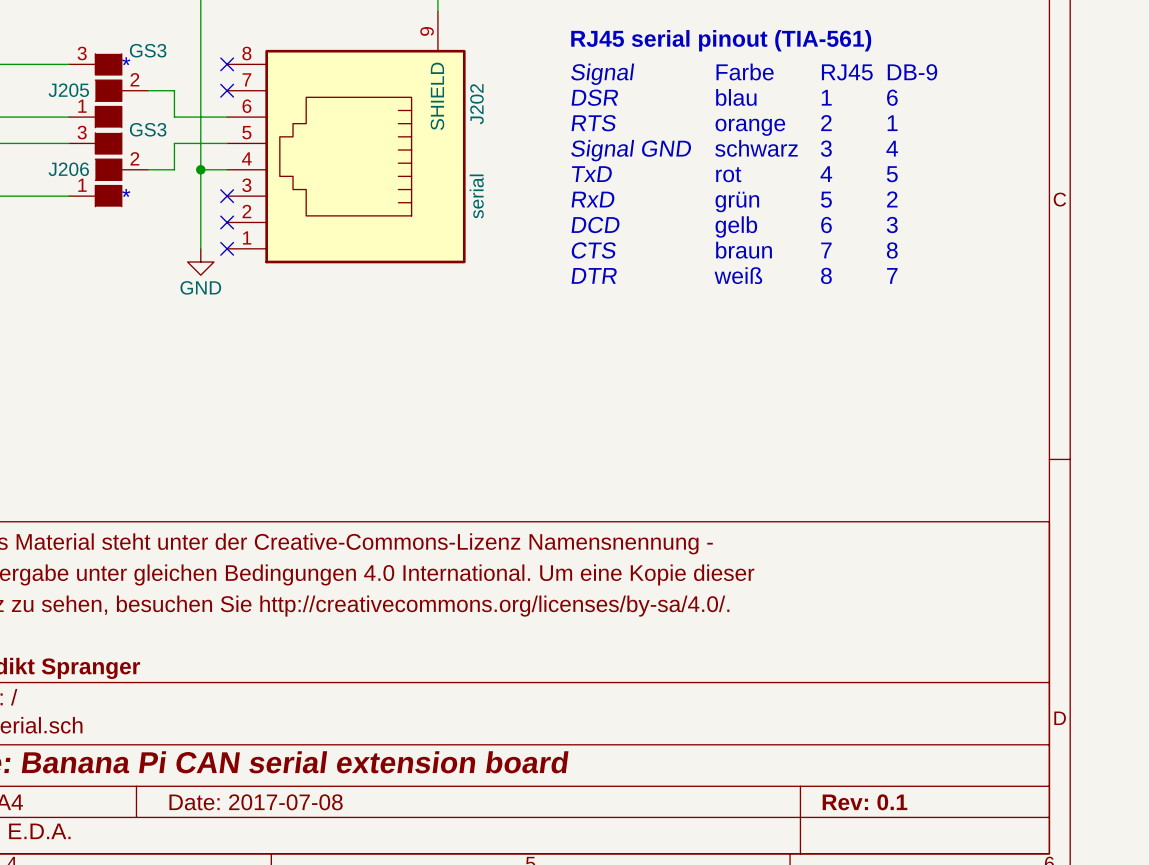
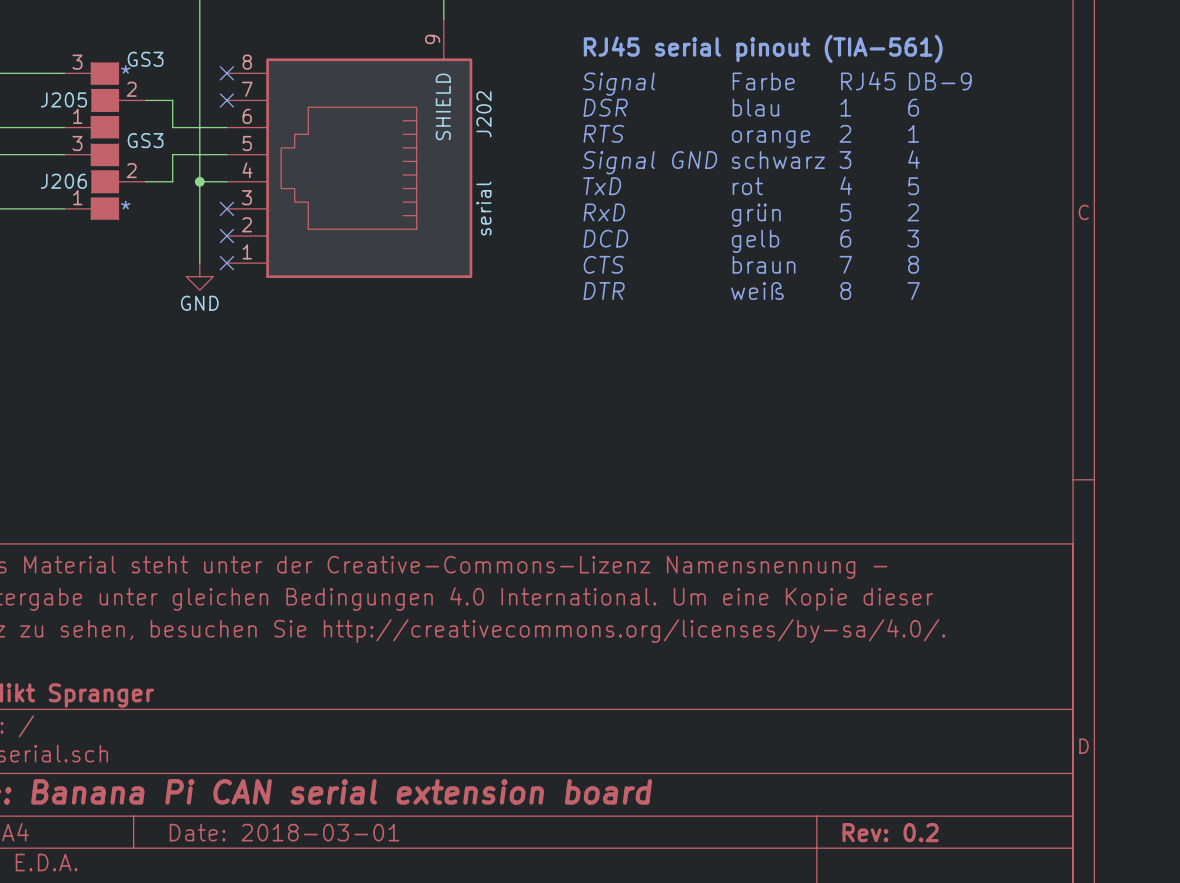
title block: Date: 2017-07-08 (256, 802) -> Date: 2018-03-01 (284, 832)
title block: Rev: 0.1 (865, 802) -> Rev: 0.2 (890, 832)

